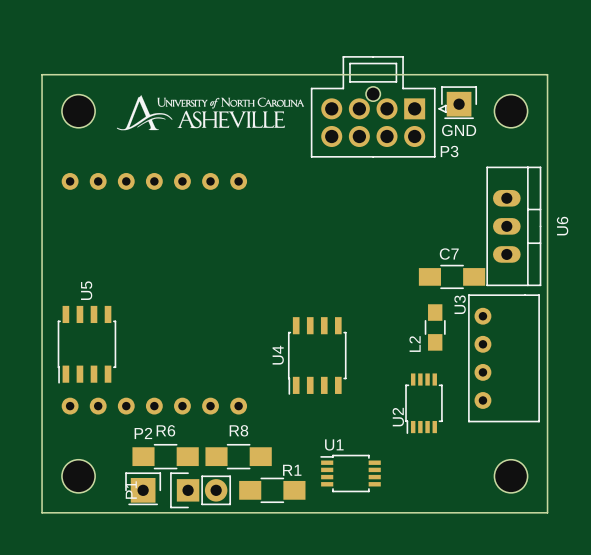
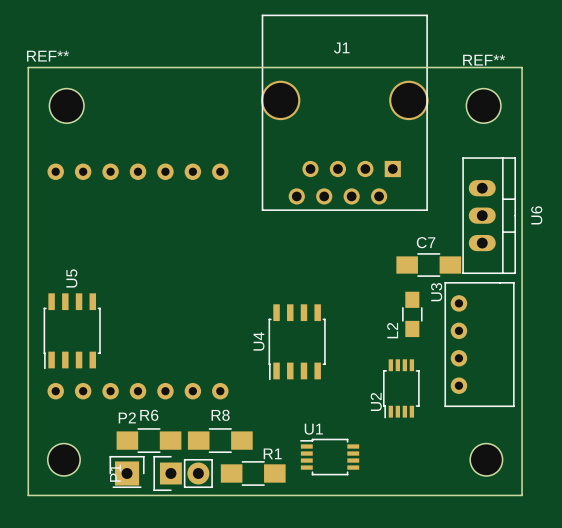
drawing: [116, 95, 305, 131] -> none
GND: (459, 102) -> none
P3: (378, 106) -> none
part: (78, 111) -> none
part: (511, 111) -> none
REF**: none -> (66, 105)
REF**: none -> (483, 105)
J1: none -> (344, 112)

